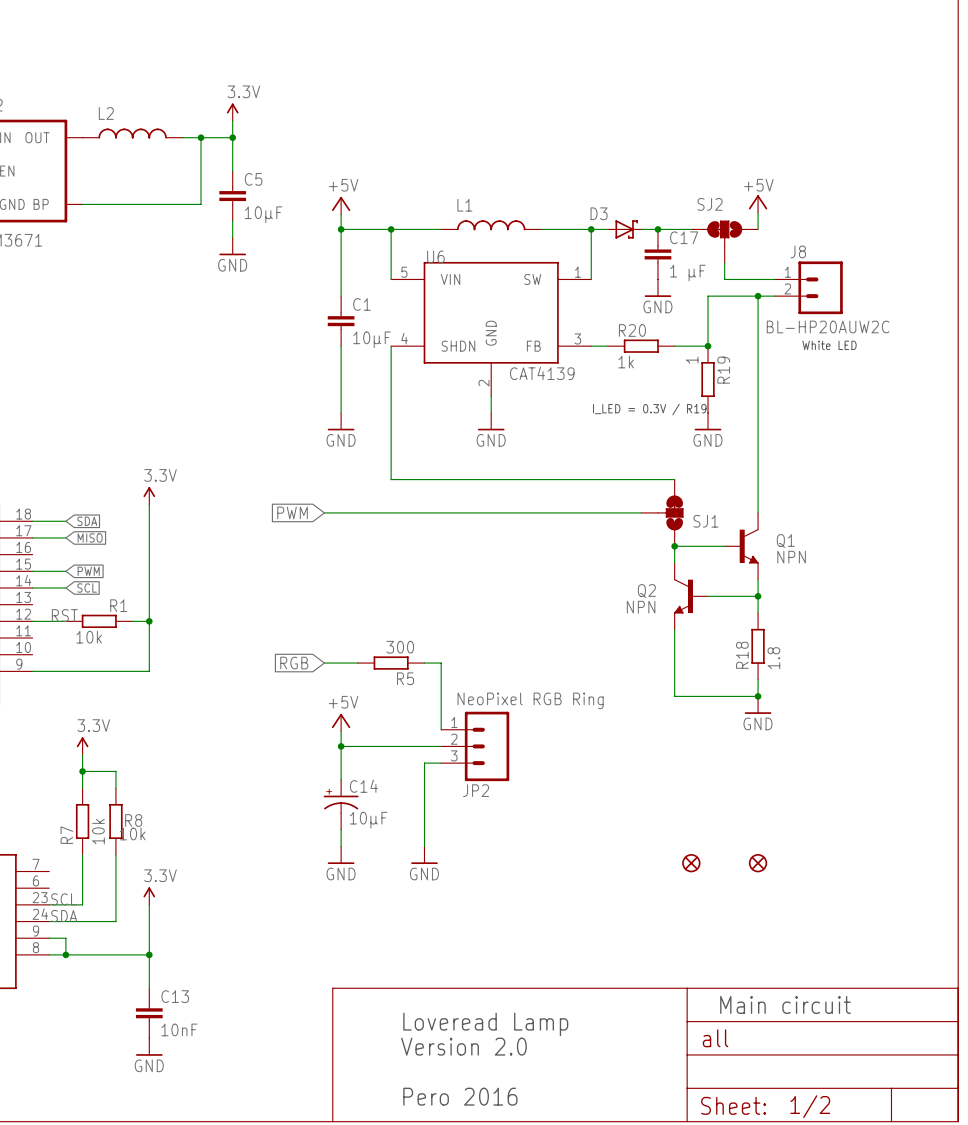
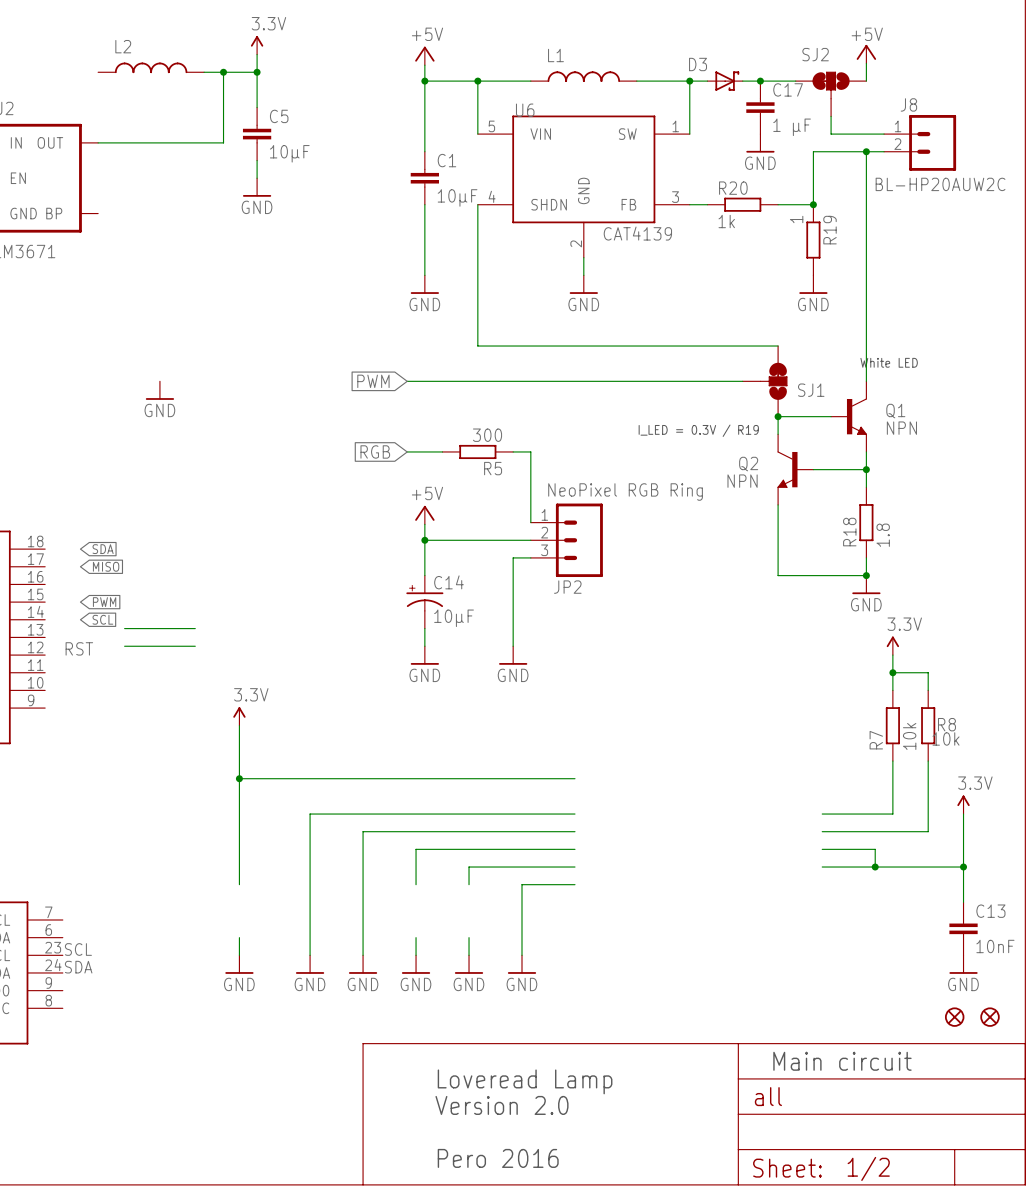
wire: none -> (257, 54) (257, 107)
power symbol: none -> +5V (424, 55)
wire: none -> (204, 72) (257, 72)
wire: none -> (223, 72) (223, 142)
junction: none -> (223, 72)
junction: none -> (257, 72)
junction: none -> (424, 81)
wire: none -> (477, 81) (477, 134)
junction: none -> (477, 81)
junction: none -> (689, 81)
junction: none -> (760, 81)
power symbol position: 3.3V (232, 112) -> 3.3V (257, 45)
L2 position: (132, 133) -> (151, 67)
wire: none -> (98, 142) (204, 142)
junction: (201, 137) -> none
wire: (232, 137) (201, 137) (201, 204) (82, 204) -> none
junction: (232, 137) -> none
power symbol: none -> GND (760, 143)
junction: none -> (866, 151)
C5 position: (232, 196) -> (257, 134)
wire: none -> (424, 204) (424, 240)
junction: none -> (813, 204)
power symbol position: +5V (758, 203) -> +5V (866, 54)
power symbol: +5V (341, 205) -> none
wire: (758, 212) (758, 229) -> (866, 63) (866, 81)
wire: (341, 214) (341, 296) -> (424, 65) (424, 151)
wire: (232, 221) (232, 237) -> none
L1 position: (491, 225) -> (583, 76)
wire: (341, 229) (441, 229) -> (424, 81) (530, 81)
junction: (341, 229) -> none
junction: (391, 229) -> none
wire: (541, 229) (607, 229) -> (636, 81) (707, 81)
wire: (591, 229) (591, 279) -> (689, 81) (689, 134)
junction: (591, 229) -> none
D3 position: (624, 229) -> (725, 81)
wire: (641, 229) (691, 229) -> (742, 81) (795, 81)
junction: (657, 229) -> none
SJ2 position: (724, 241) -> (831, 94)
power symbol position: GND (232, 246) -> GND (257, 187)
C17 position: (657, 254) -> (760, 107)
wire: (724, 262) (724, 279) (774, 279) -> (831, 116) (831, 134) (884, 134)
power symbol: none -> GND (424, 284)
power symbol: none -> GND (583, 284)
power symbol: none -> GND (813, 284)
J8 position: (808, 287) -> (920, 142)
power symbol: GND (657, 288) -> none
wire: (758, 296) (758, 512) -> (866, 151) (866, 381)
junction: (758, 296) -> none
wire: (774, 296) (708, 296) (708, 346) (674, 346) -> (884, 151) (813, 151) (813, 204) (778, 204)
C1 position: (341, 321) -> (424, 178)
U6 position: (491, 329) -> (583, 186)
wire: (341, 346) (341, 412) -> none
wire: (391, 346) (391, 479) (674, 479) -> (477, 204) (477, 346) (778, 346)
wire: (591, 346) (607, 346) -> (689, 204) (707, 204)
R20 position: (641, 346) -> (742, 204)
junction: (708, 346) -> none
wire: none -> (407, 381) (742, 381)
power symbol: none -> GND (159, 390)
R19 position: (708, 379) -> (813, 240)
wire: (491, 396) (491, 412) -> (583, 257) (583, 275)
junction: none -> (778, 416)
power symbol: GND (341, 421) -> none
power symbol: GND (491, 421) -> none
power symbol: GND (708, 421) -> none
global label: none -> RGB (375, 451)
wire: none -> (407, 451) (442, 451)
wire: none -> (513, 451) (530, 451) (530, 522)
junction: none -> (866, 469)
power symbol: none -> +5V (424, 515)
power symbol: 3.3V (149, 495) -> none
wire: none -> (424, 524) (424, 575)
wire: (149, 504) (149, 671) (32, 671) -> none
global label position: PWM (292, 512) -> PWM (373, 381)
wire: (324, 512) (391, 512) -> none
junction: none -> (424, 540)
wire: (491, 512) (641, 512) -> none
SJ1 position: (662, 512) -> (765, 381)
wire: (32, 521) (65, 521) -> none
wire: none -> (530, 557) (513, 557) (513, 646)
wire: (32, 537) (65, 537) -> none
junction: (674, 546) -> none
wire: (724, 546) (674, 546) (674, 562) -> (831, 416) (778, 416) (778, 434)
Q1 position: (741, 546) -> (848, 416)
junction: none -> (866, 575)
power symbol: none -> GND (866, 584)
wire: (32, 571) (65, 571) -> none
wire: (758, 579) (758, 613) -> (866, 451) (866, 487)
wire: (32, 587) (65, 587) -> none
wire: none -> (124, 628) (195, 628)
wire: none -> (424, 628) (424, 646)
Q2 position: (691, 596) -> (795, 469)
wire: (708, 596) (758, 596) -> (813, 469) (866, 469)
junction: (758, 596) -> none
power symbol: none -> 3.3V (892, 645)
wire: none -> (124, 646) (195, 646)
wire: (32, 621) (65, 621) -> none
R1: 10k (99, 621) -> none
wire: (132, 621) (149, 621) -> none
junction: (149, 621) -> none
power symbol: none -> GND (424, 655)
power symbol: none -> GND (513, 655)
wire: none -> (892, 655) (892, 690)
wire: (674, 629) (674, 696) (758, 696) (758, 679) -> (778, 504) (778, 575) (866, 575) (866, 557)
wire: none -> (892, 672) (928, 672) (928, 690)
junction: none -> (892, 672)
R18 position: (758, 646) -> (866, 522)
global label: RGB (294, 663) -> none
wire: (324, 663) (357, 663) -> none
R5 position: (391, 663) -> (477, 451)
wire: (424, 663) (441, 663) (441, 729) -> none
power symbol: none -> 3.3V (239, 716)
wire: none -> (239, 725) (239, 884)
junction: (758, 696) -> none
power symbol: GND (758, 705) -> none
wire: none -> (892, 761) (892, 814) (822, 814)
wire: none -> (928, 761) (928, 831) (822, 831)
power symbol: +5V (341, 722) -> none
wire: (341, 731) (341, 779) -> none
wire: none -> (239, 778) (574, 778)
junction: none -> (239, 778)
power symbol: 3.3V (82, 746) -> none
wire: (341, 746) (441, 746) -> none
junction: (341, 746) -> none
JP2 position: (475, 746) -> (566, 540)
wire: (82, 754) (82, 788) -> none
power symbol: none -> 3.3V (963, 804)
wire: (441, 763) (424, 763) (424, 846) -> none
wire: (82, 771) (115, 771) (115, 788) -> none
junction: (82, 771) -> none
wire: none -> (574, 814) (310, 814) (310, 955)
wire: none -> (963, 814) (963, 902)
wire: none -> (574, 831) (363, 831) (363, 955)
C14 position: (341, 804) -> (424, 602)
wire: none -> (574, 849) (416, 849) (416, 884)
wire: none -> (822, 849) (875, 849) (875, 867)
R7 position: (82, 821) -> (892, 725)
R8 position: (115, 821) -> (928, 725)
wire: none -> (574, 867) (469, 867) (469, 884)
wire: none -> (822, 867) (963, 867)
junction: none -> (875, 867)
junction: none -> (963, 867)
wire: (341, 829) (341, 846) -> (416, 937) (416, 955)
wire: none -> (574, 884) (522, 884) (522, 955)
wire: (82, 854) (82, 904) (49, 904) -> none
wire: (115, 854) (115, 921) (49, 921) -> none
power symbol: GND (341, 855) -> none
power symbol: GND (424, 855) -> none
part: (691, 863) -> none
part: (758, 863) -> none
wire: none -> (239, 937) (239, 955)
wire: none -> (469, 937) (469, 955)
power symbol: 3.3V (149, 896) -> none
wire: (149, 904) (149, 988) -> none
power symbol: none -> GND (239, 964)
power symbol: none -> GND (310, 964)
power symbol: none -> GND (363, 964)
power symbol: none -> GND (416, 964)
power symbol: none -> GND (469, 964)
power symbol: none -> GND (522, 964)
power symbol: none -> GND (963, 964)
wire: (49, 938) (65, 938) (65, 954) -> none
wire: (49, 954) (149, 954) -> none
junction: (65, 954) -> none
junction: (149, 954) -> none
part: none -> (954, 1017)
part: none -> (990, 1017)
C13 position: (149, 1013) -> (963, 928)
power symbol: GND (149, 1047) -> none

